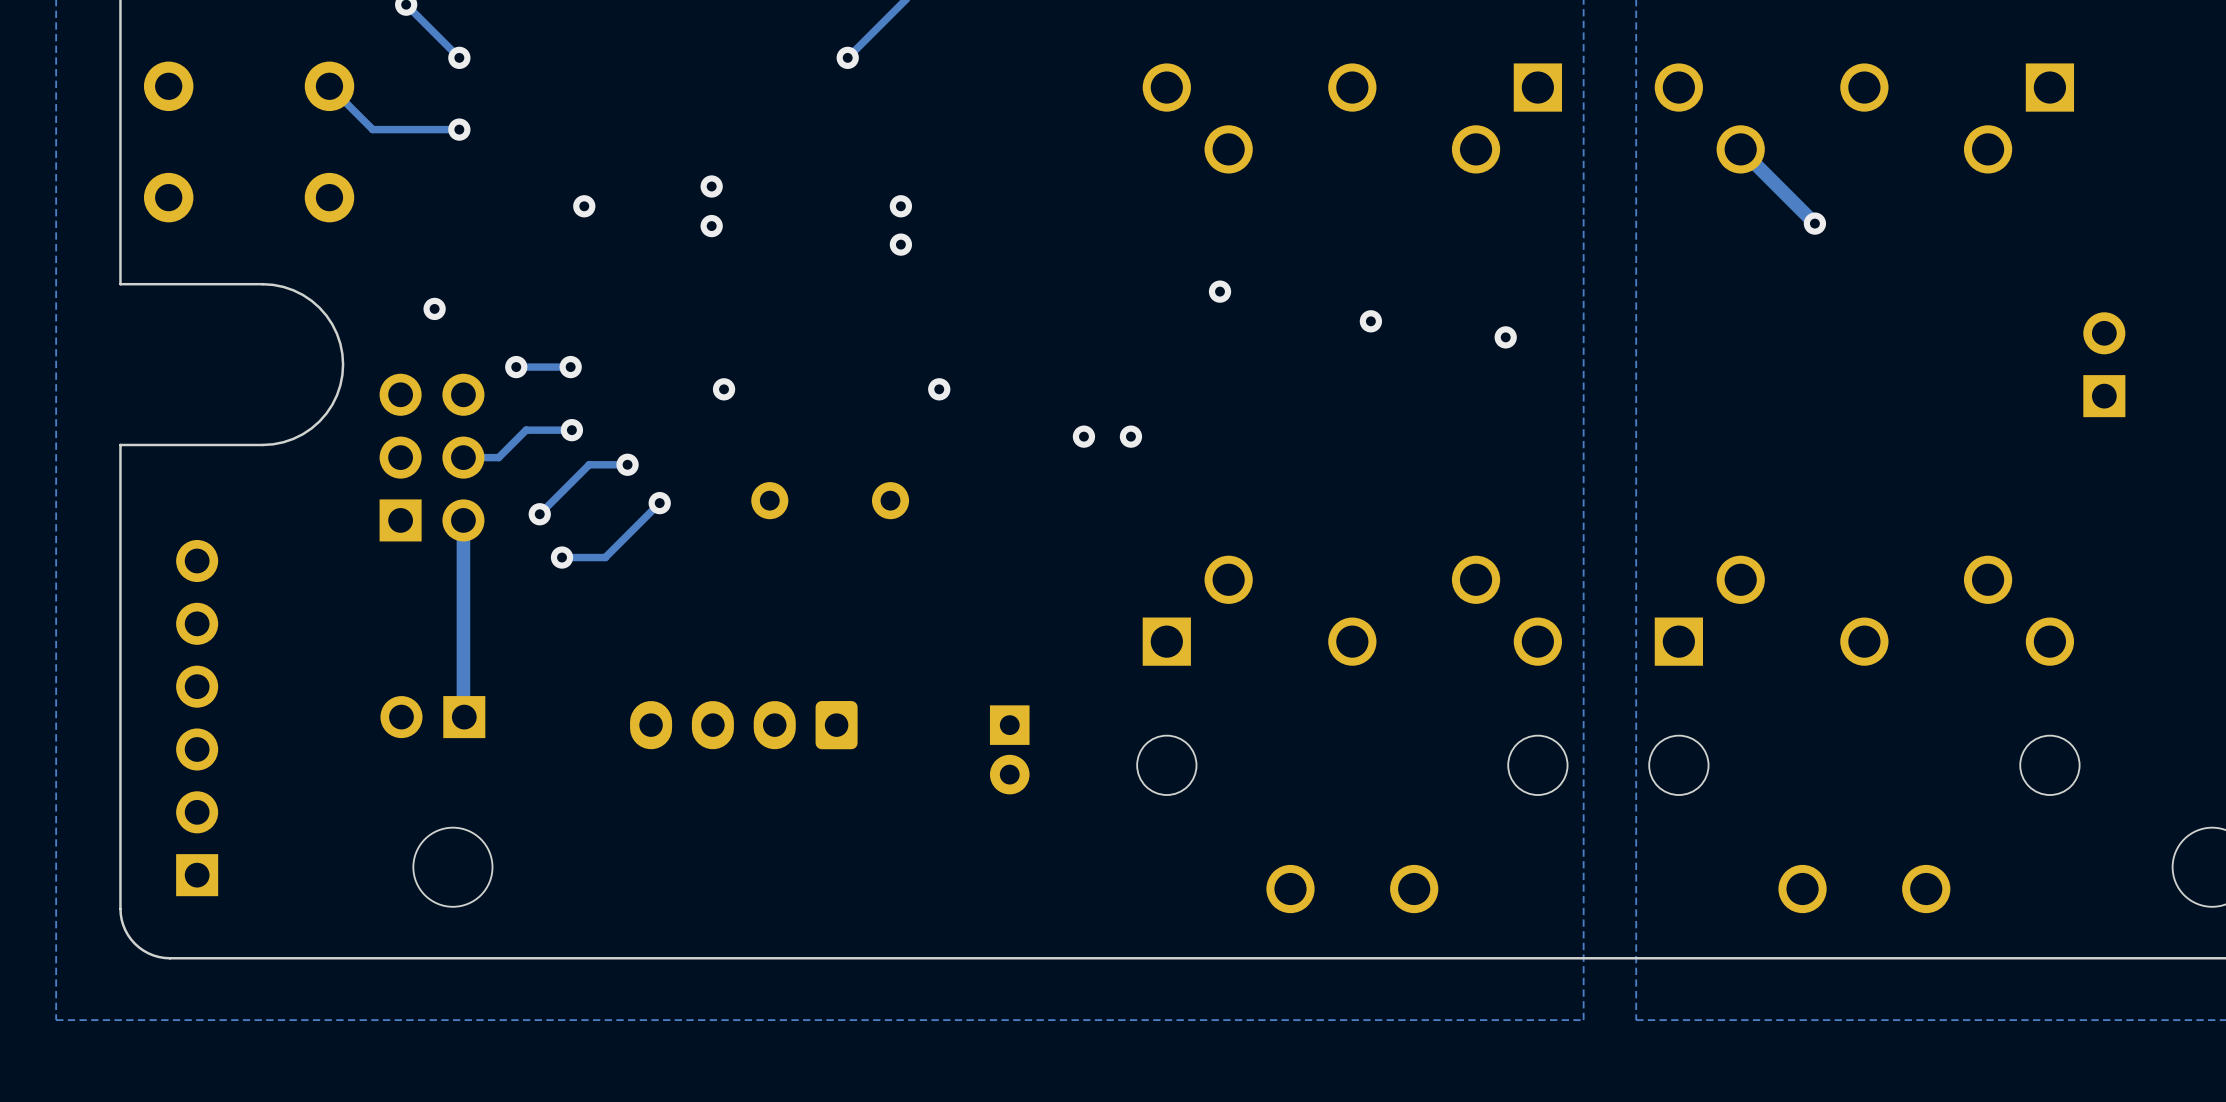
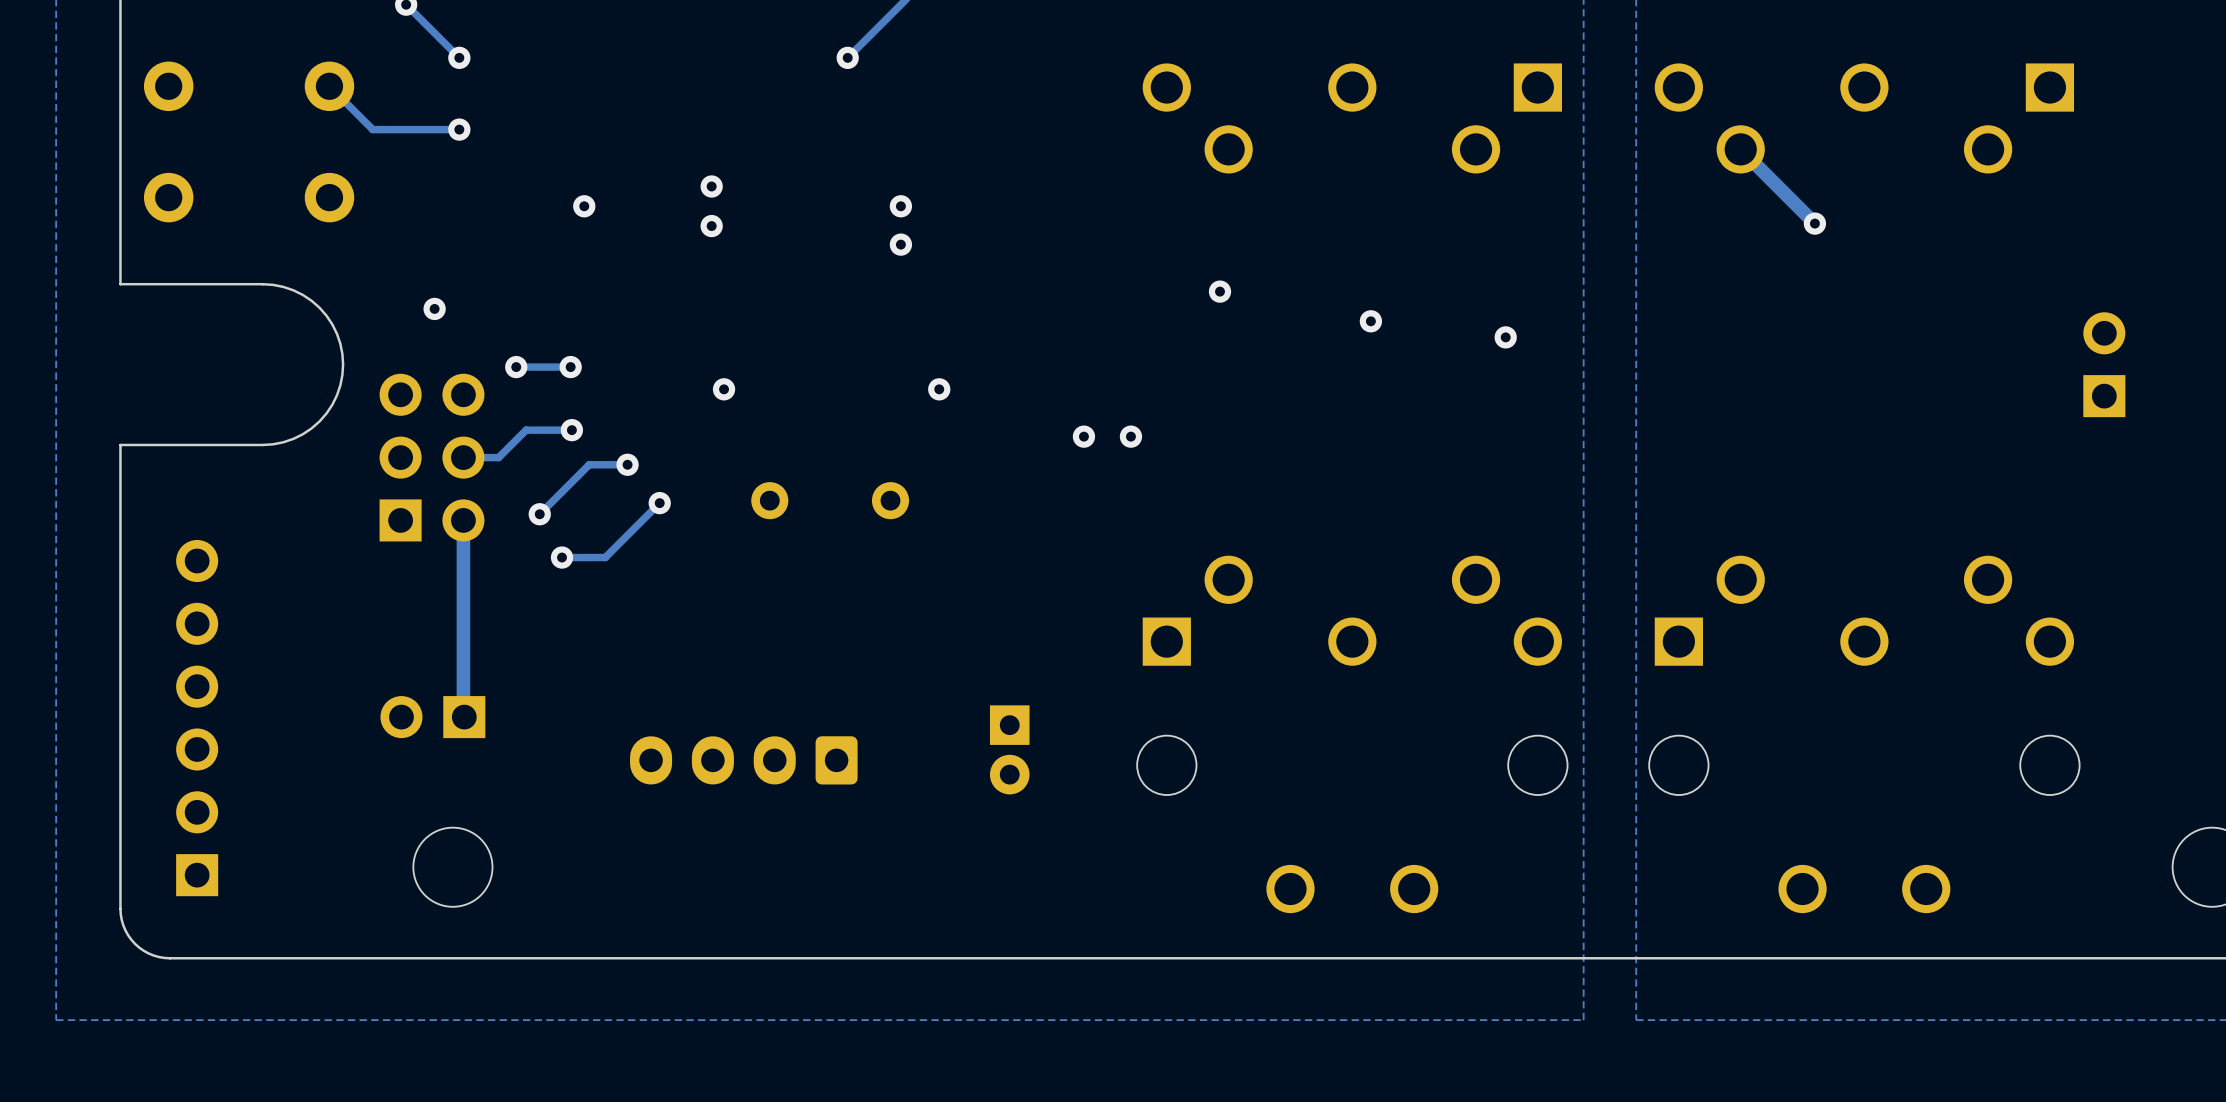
part position: (743, 725) -> (743, 760)

